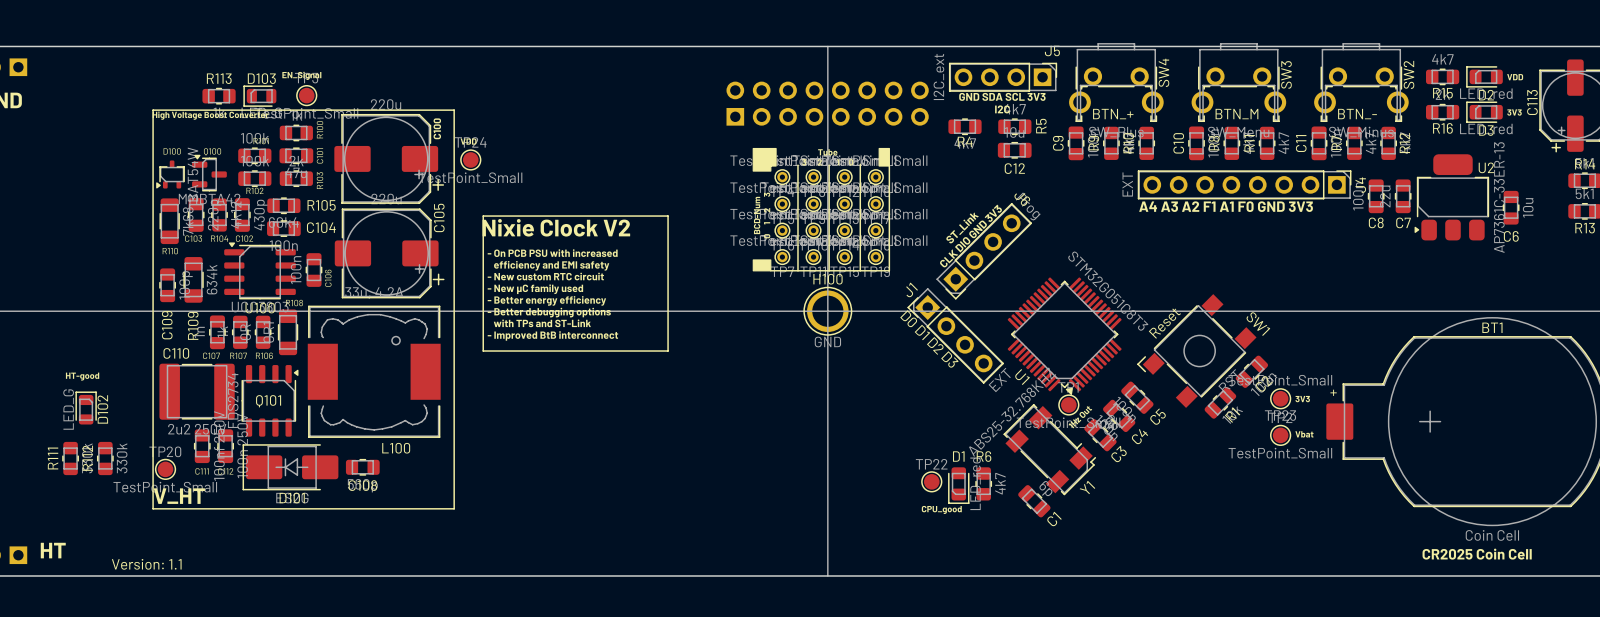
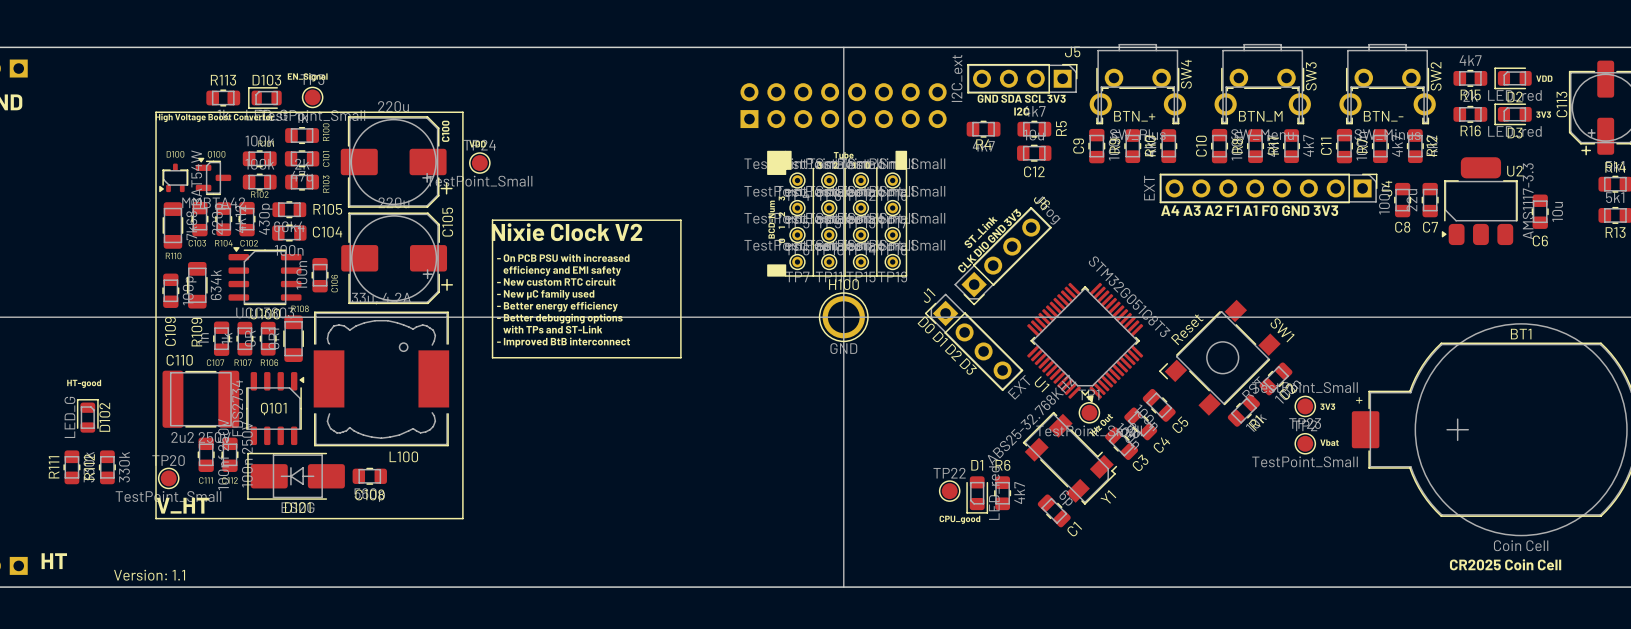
U2 value: AP7361C-33ER-13 (1499, 197) -> AMS1117-3.3 (1528, 201)

